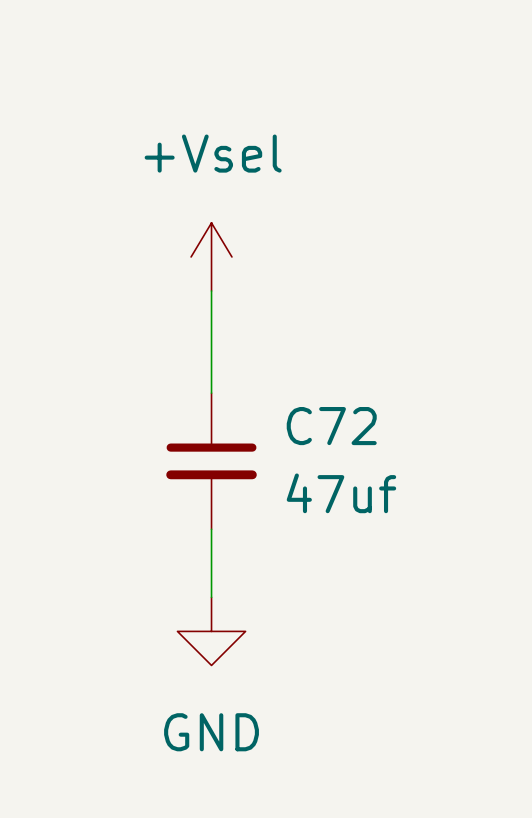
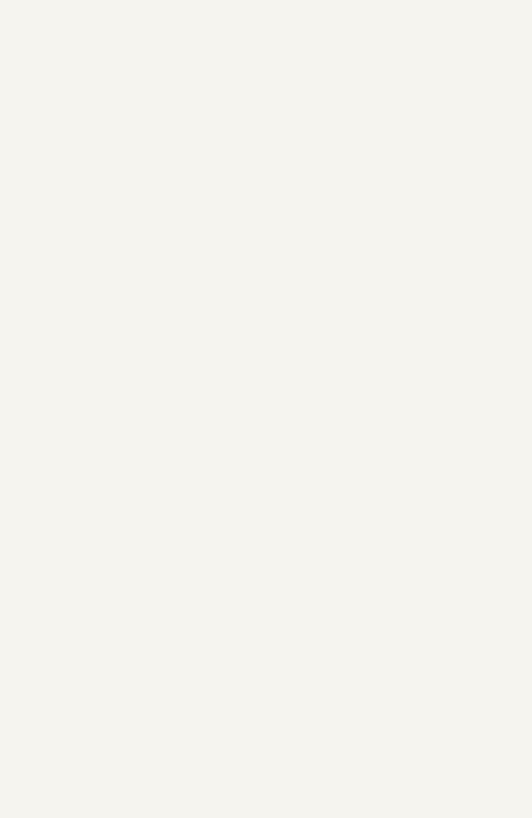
power symbol: +Vsel (211, 256) -> none
wire: (211, 291) (211, 393) -> none
C72: 47uf (211, 461) -> none
wire: (211, 529) (211, 597) -> none
power symbol: GND (211, 631) -> none

